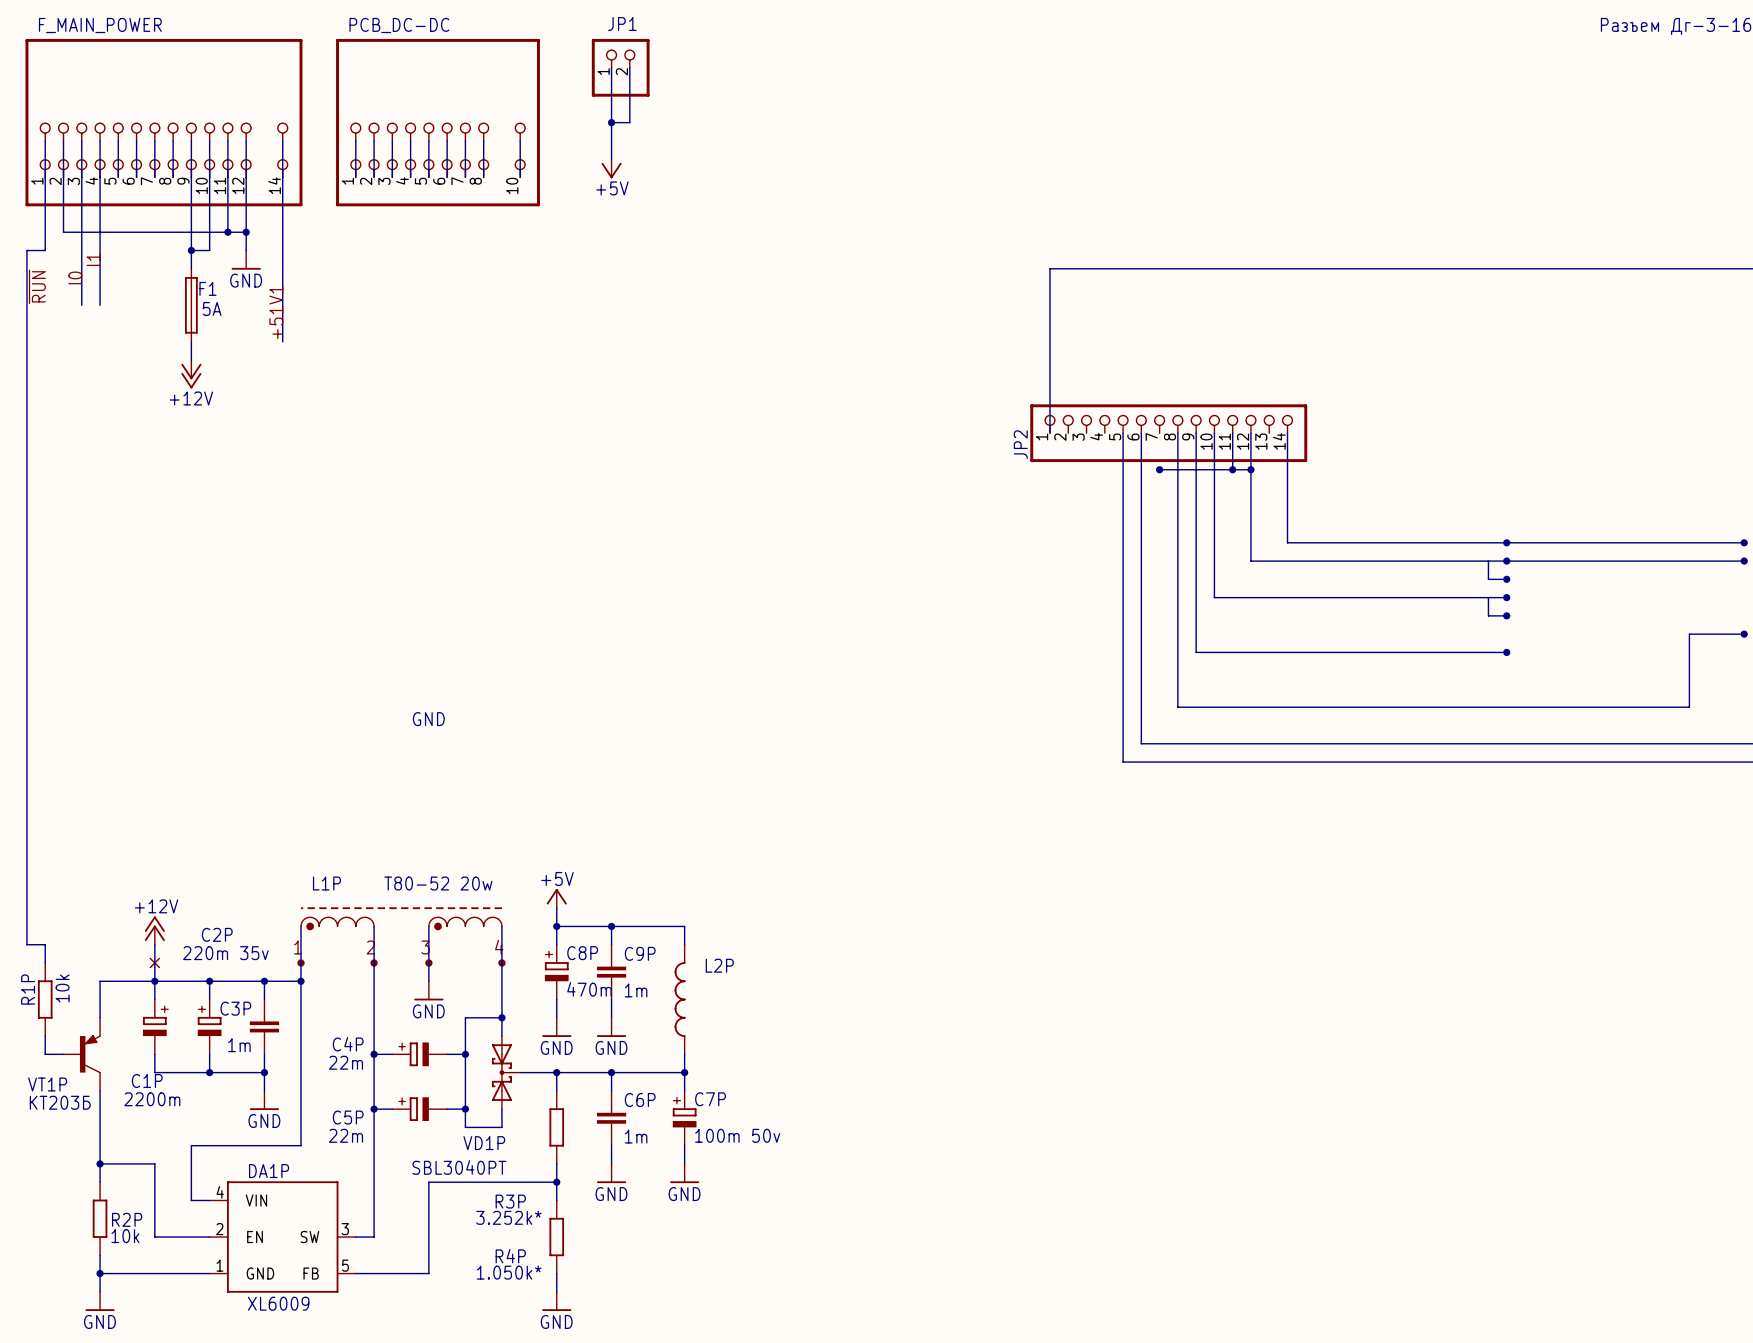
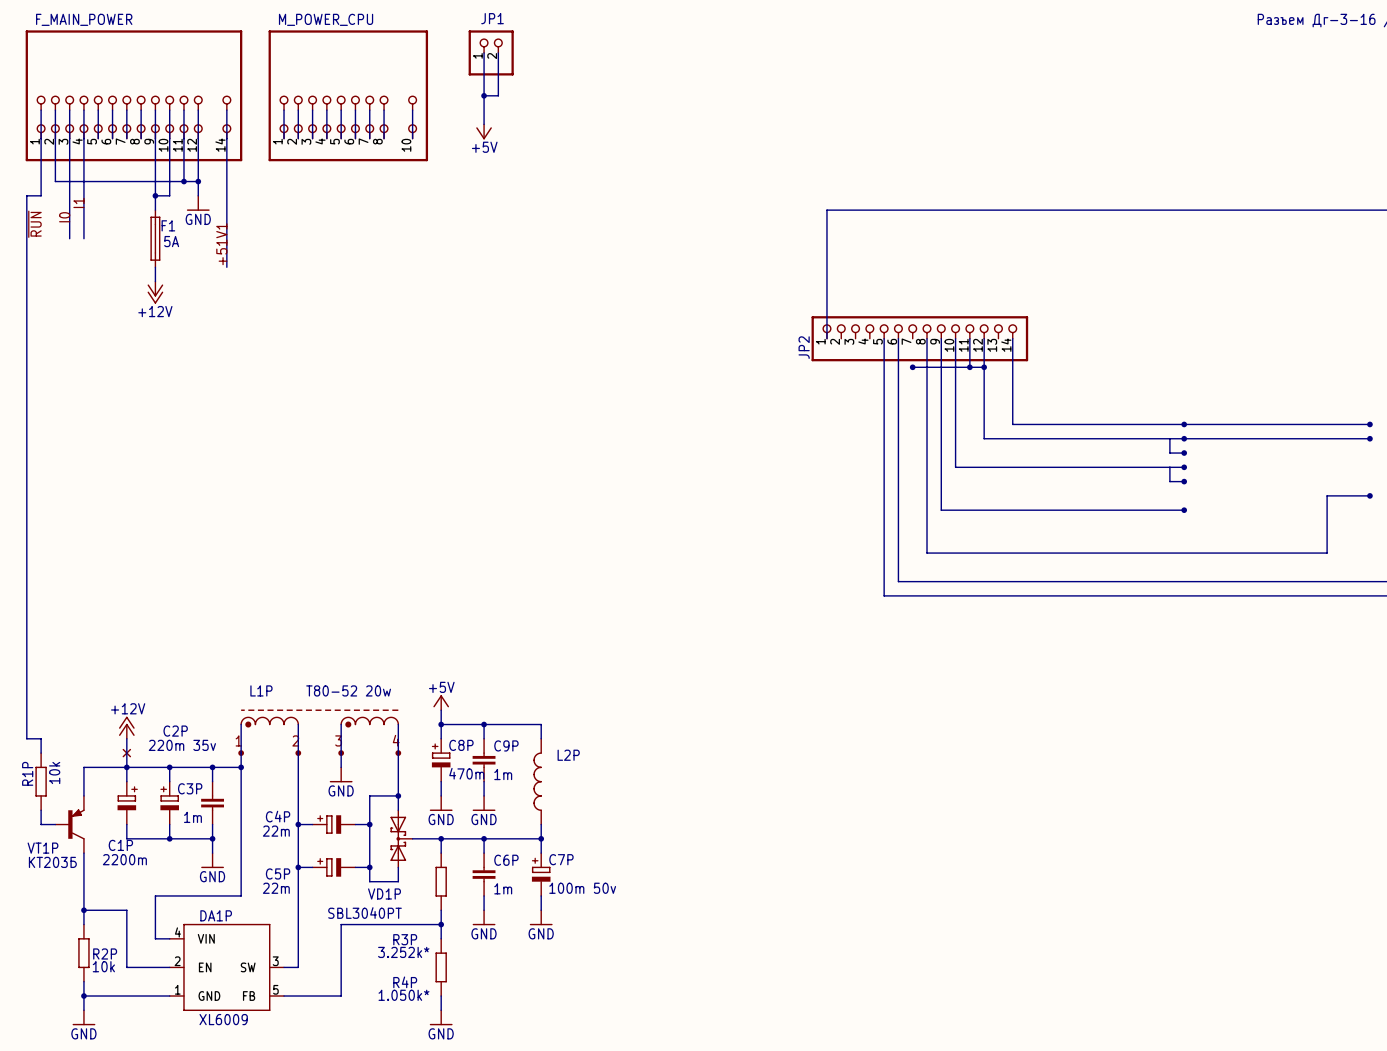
PCB_DC-DC name: PCB_DC-DC (399, 25) -> M_POWER_CPU (326, 19)
part: (428, 719) -> none

